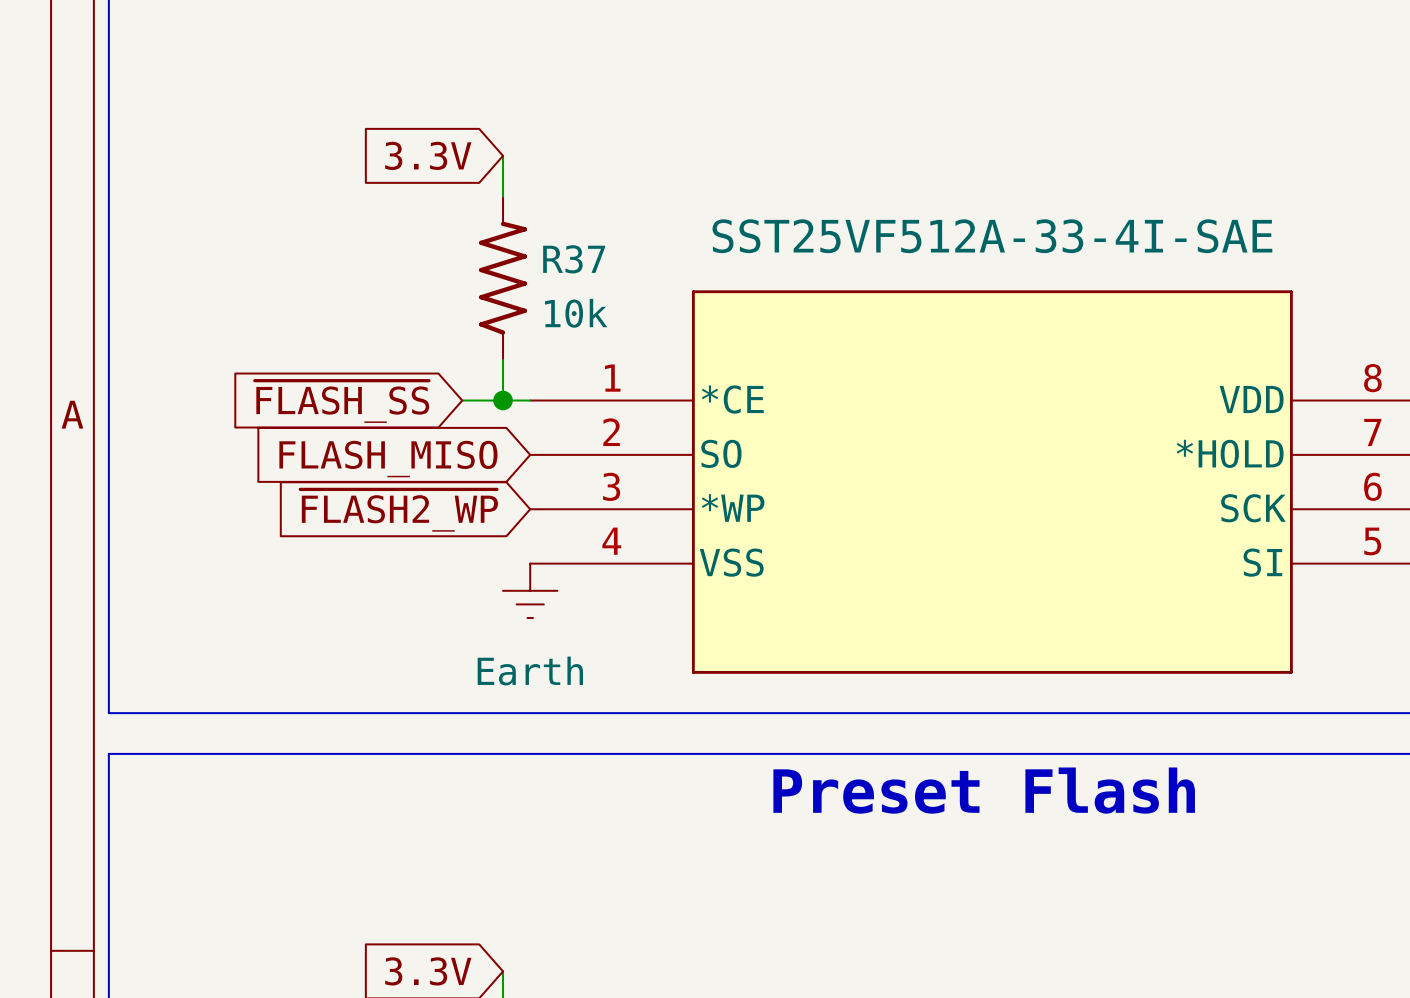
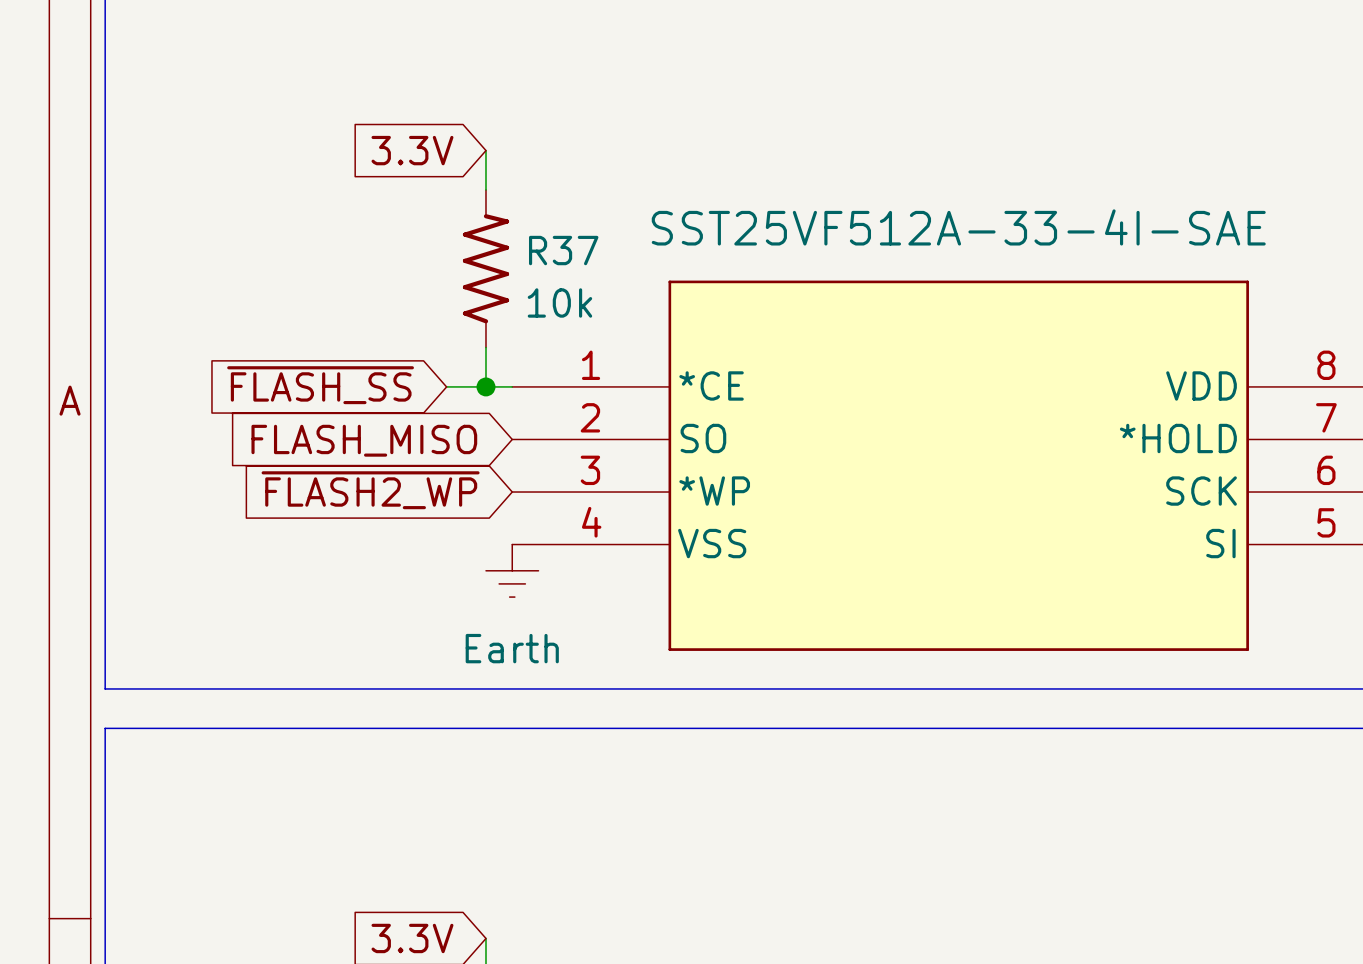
text: Preset Flash (984, 790) -> none

